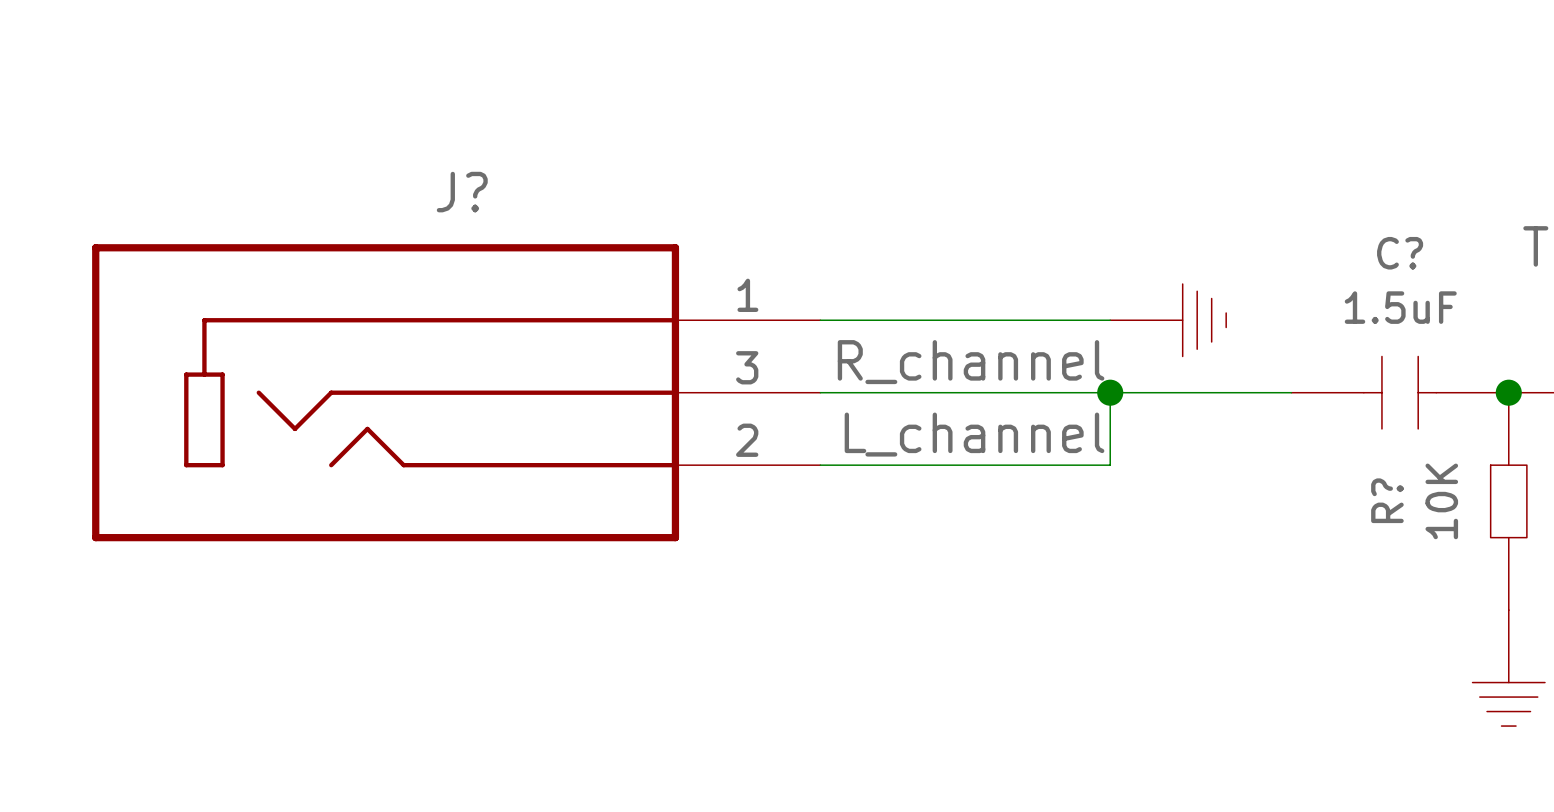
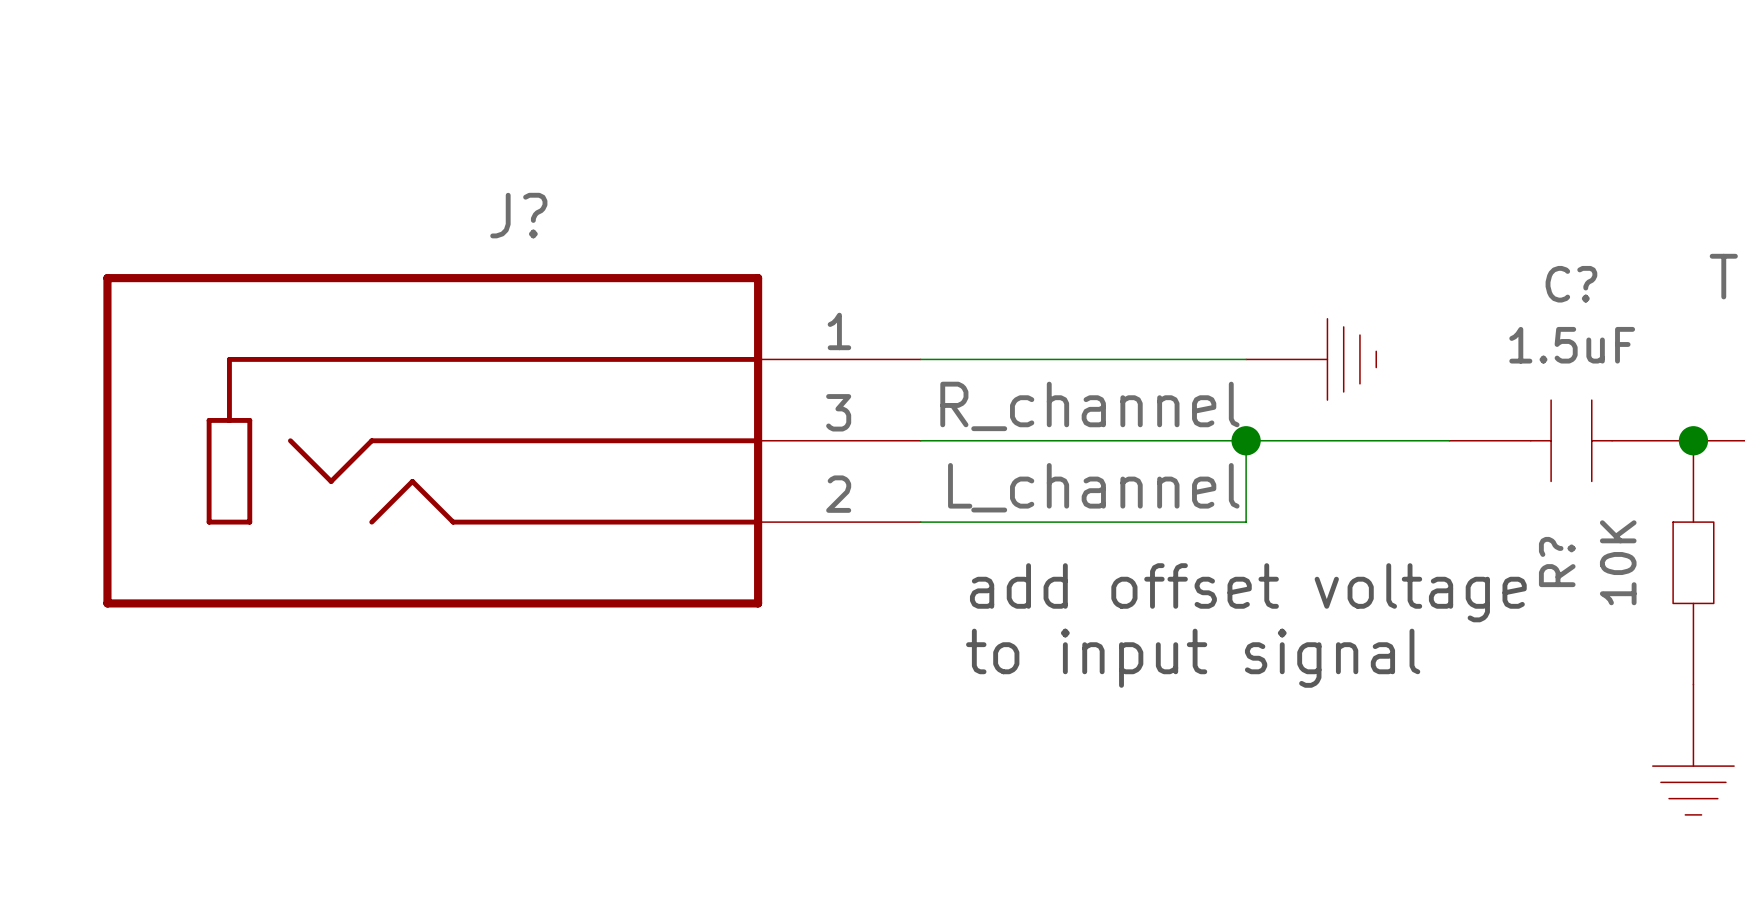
text: none -> add offset voltage (1248, 592)
text: none -> to input signal (1193, 658)

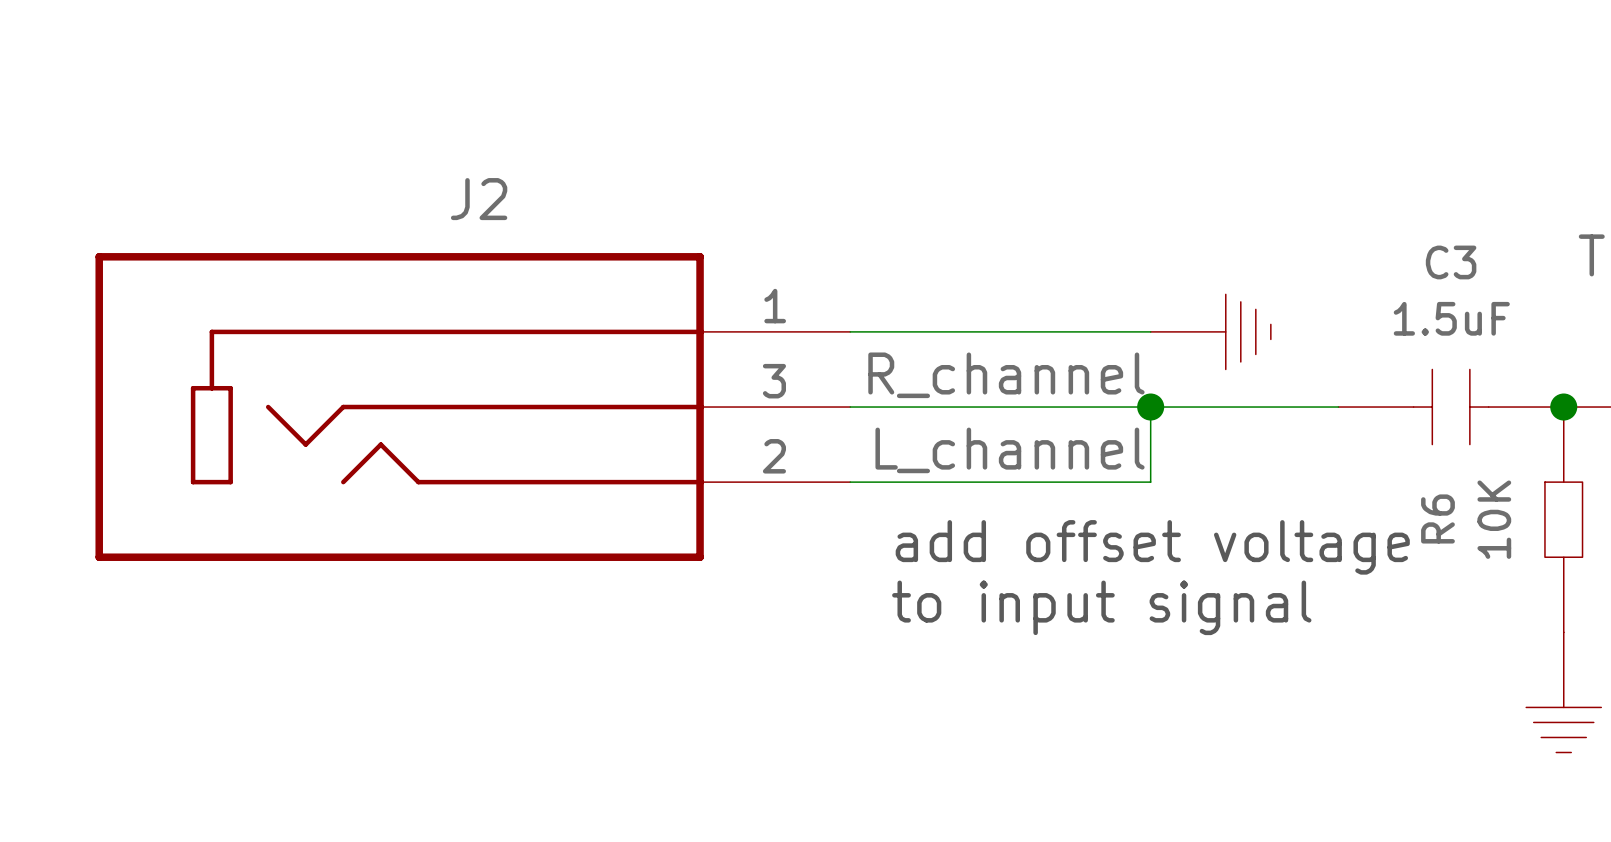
J? name: J? (518, 215) -> J2 (479, 199)
C? name: C? (1571, 284) -> C3 (1451, 262)
R? name: R? (1557, 562) -> R6 (1437, 518)

